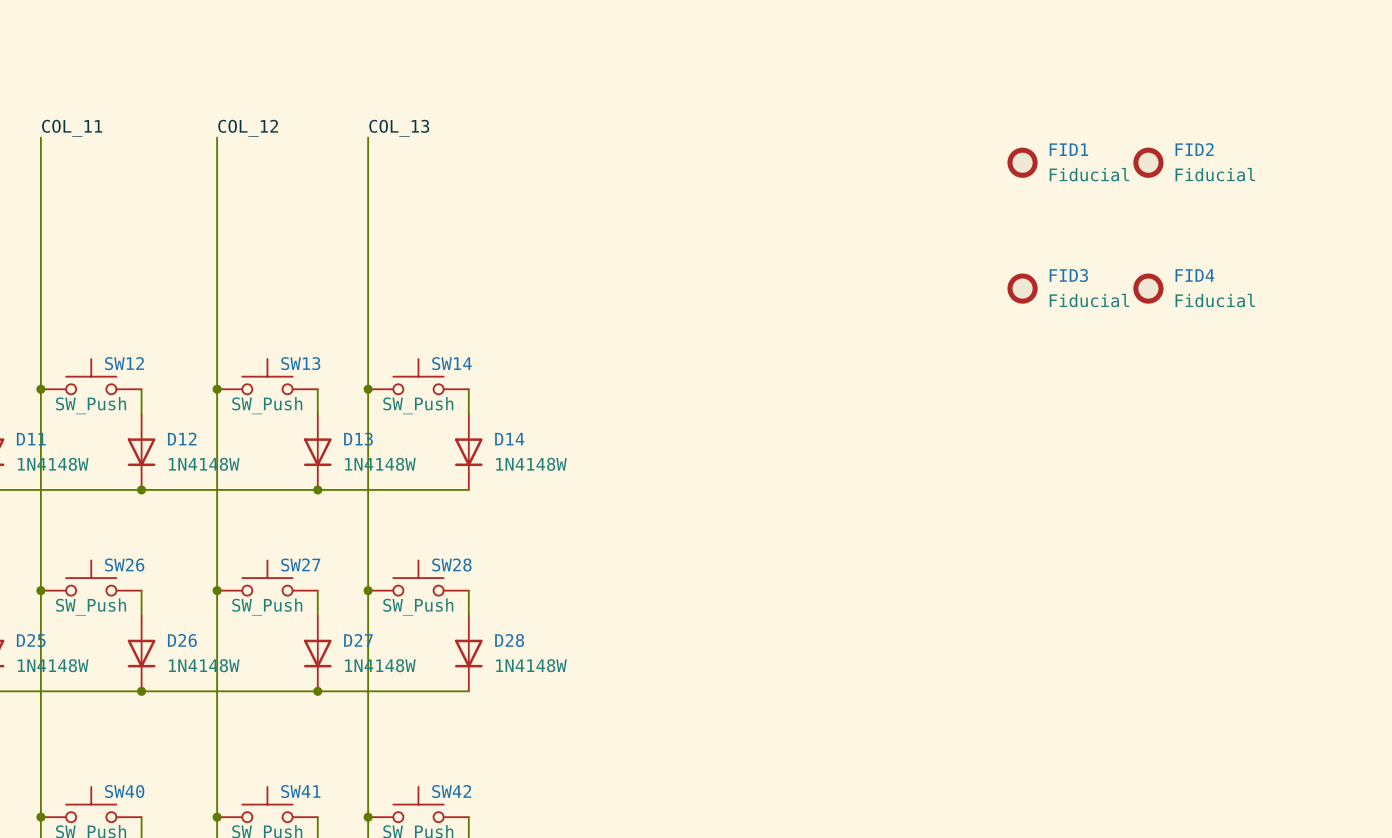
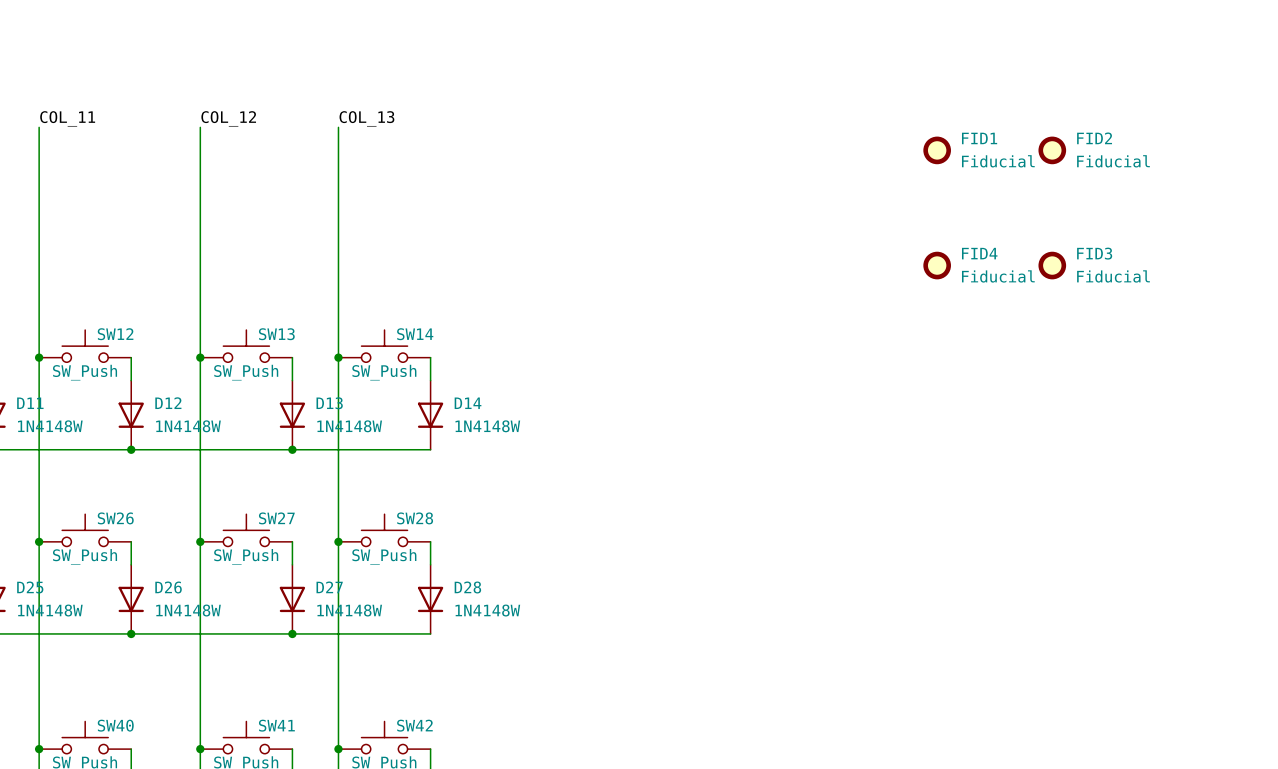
FID3 name: FID3 (1068, 275) -> FID4 (979, 253)
FID4 name: FID4 (1194, 275) -> FID3 (1094, 253)

